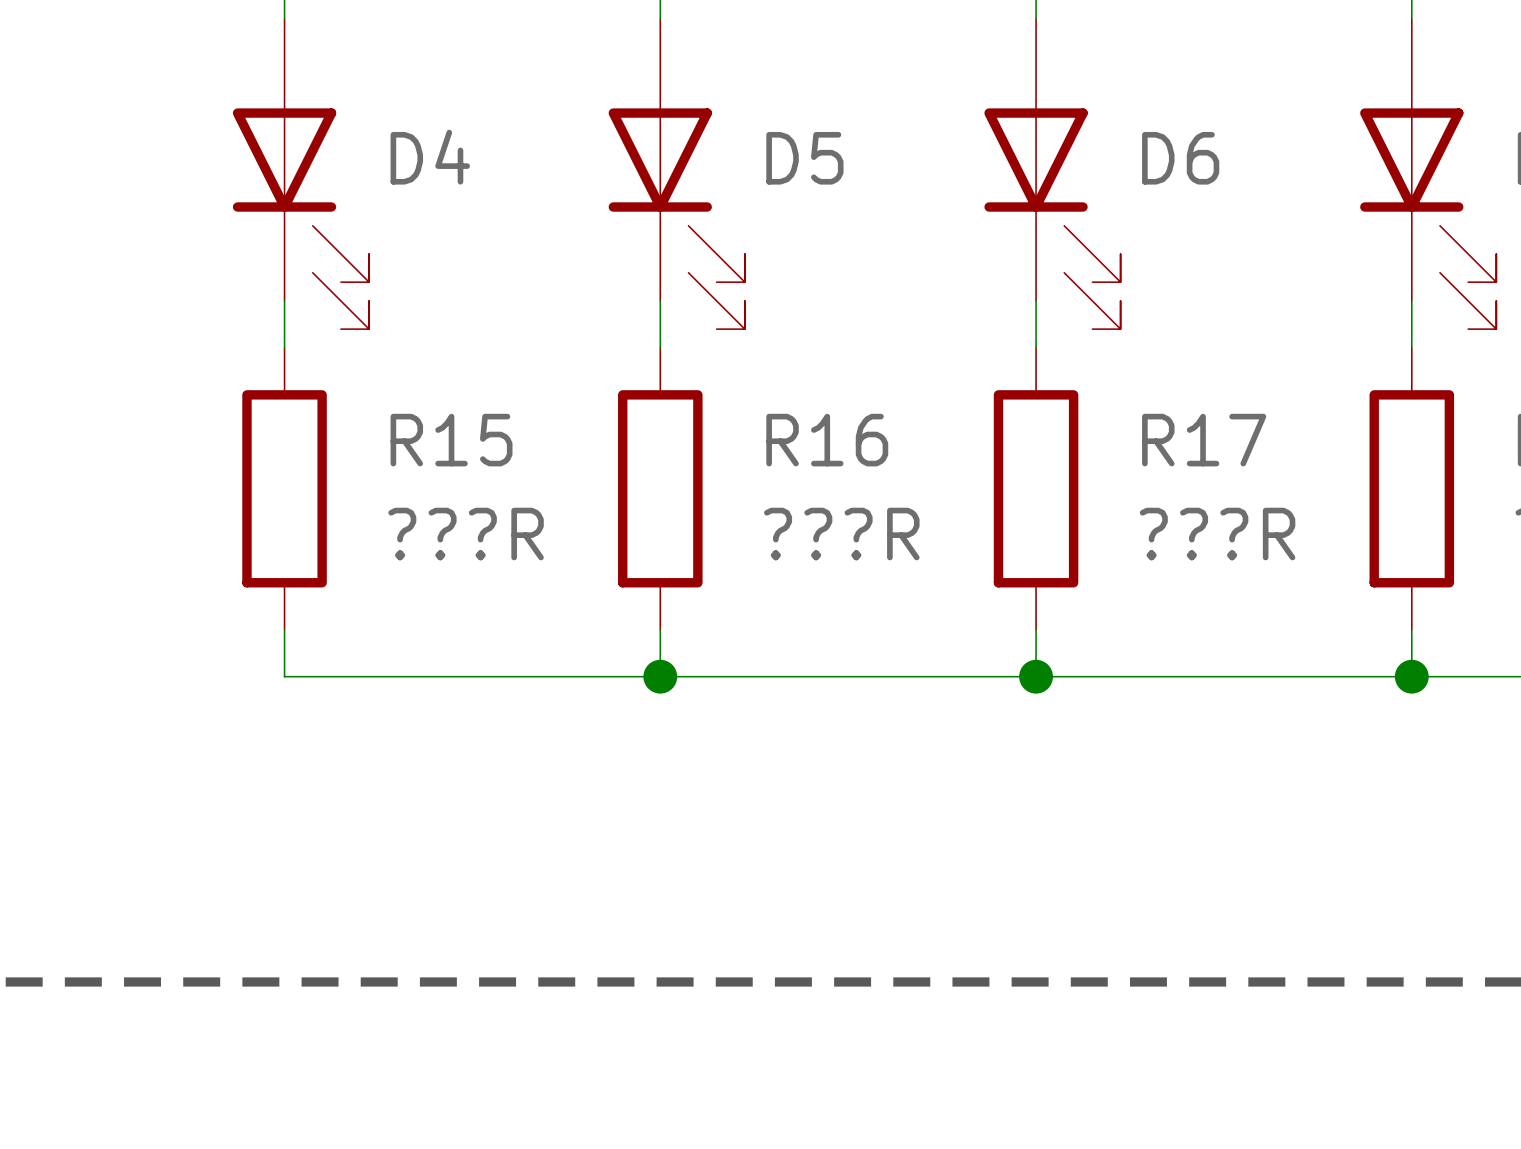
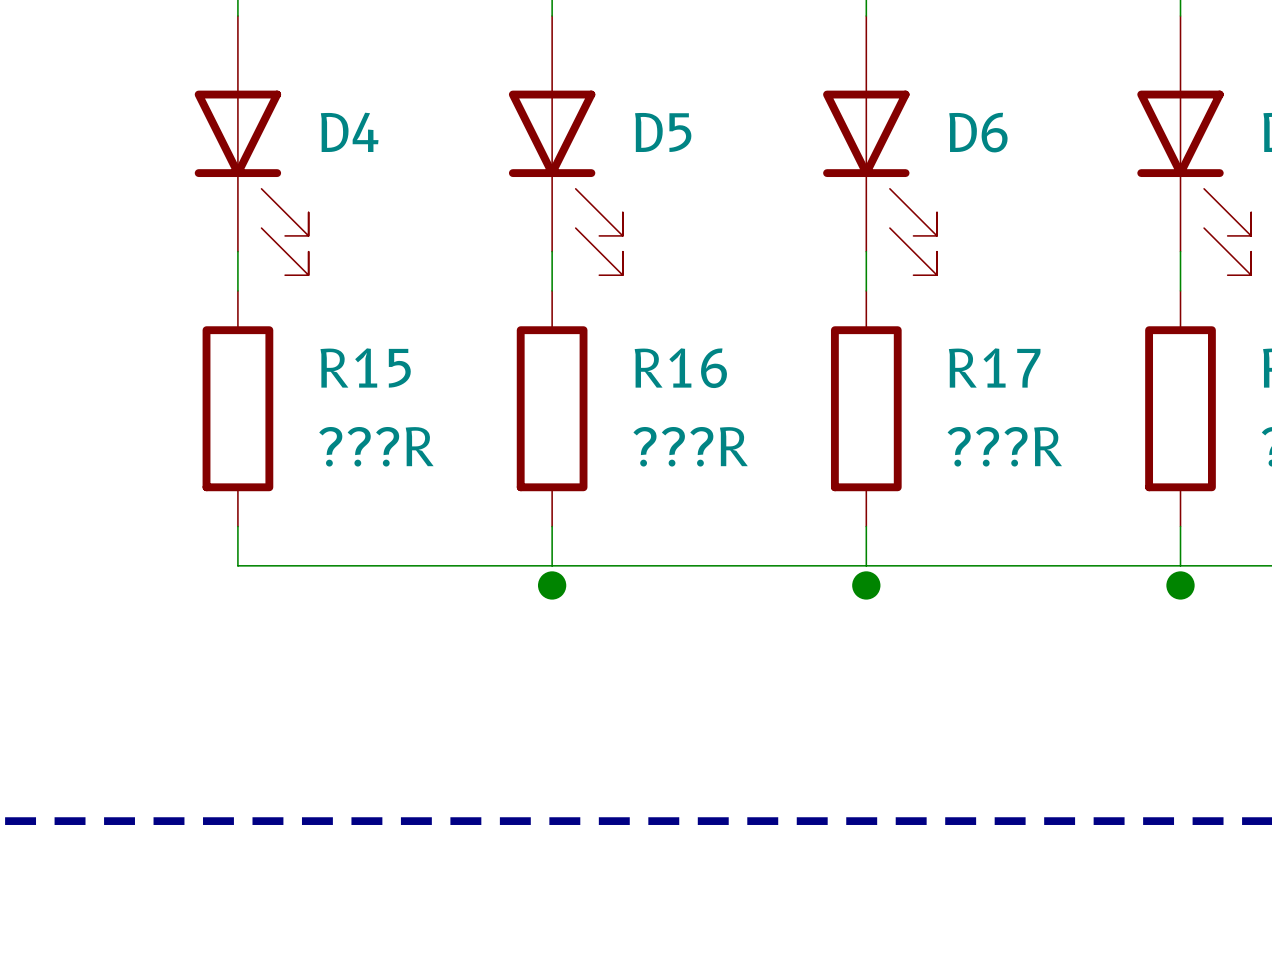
junction position: (660, 676) -> (552, 585)
junction position: (1036, 676) -> (866, 585)
junction position: (1411, 676) -> (1180, 585)

